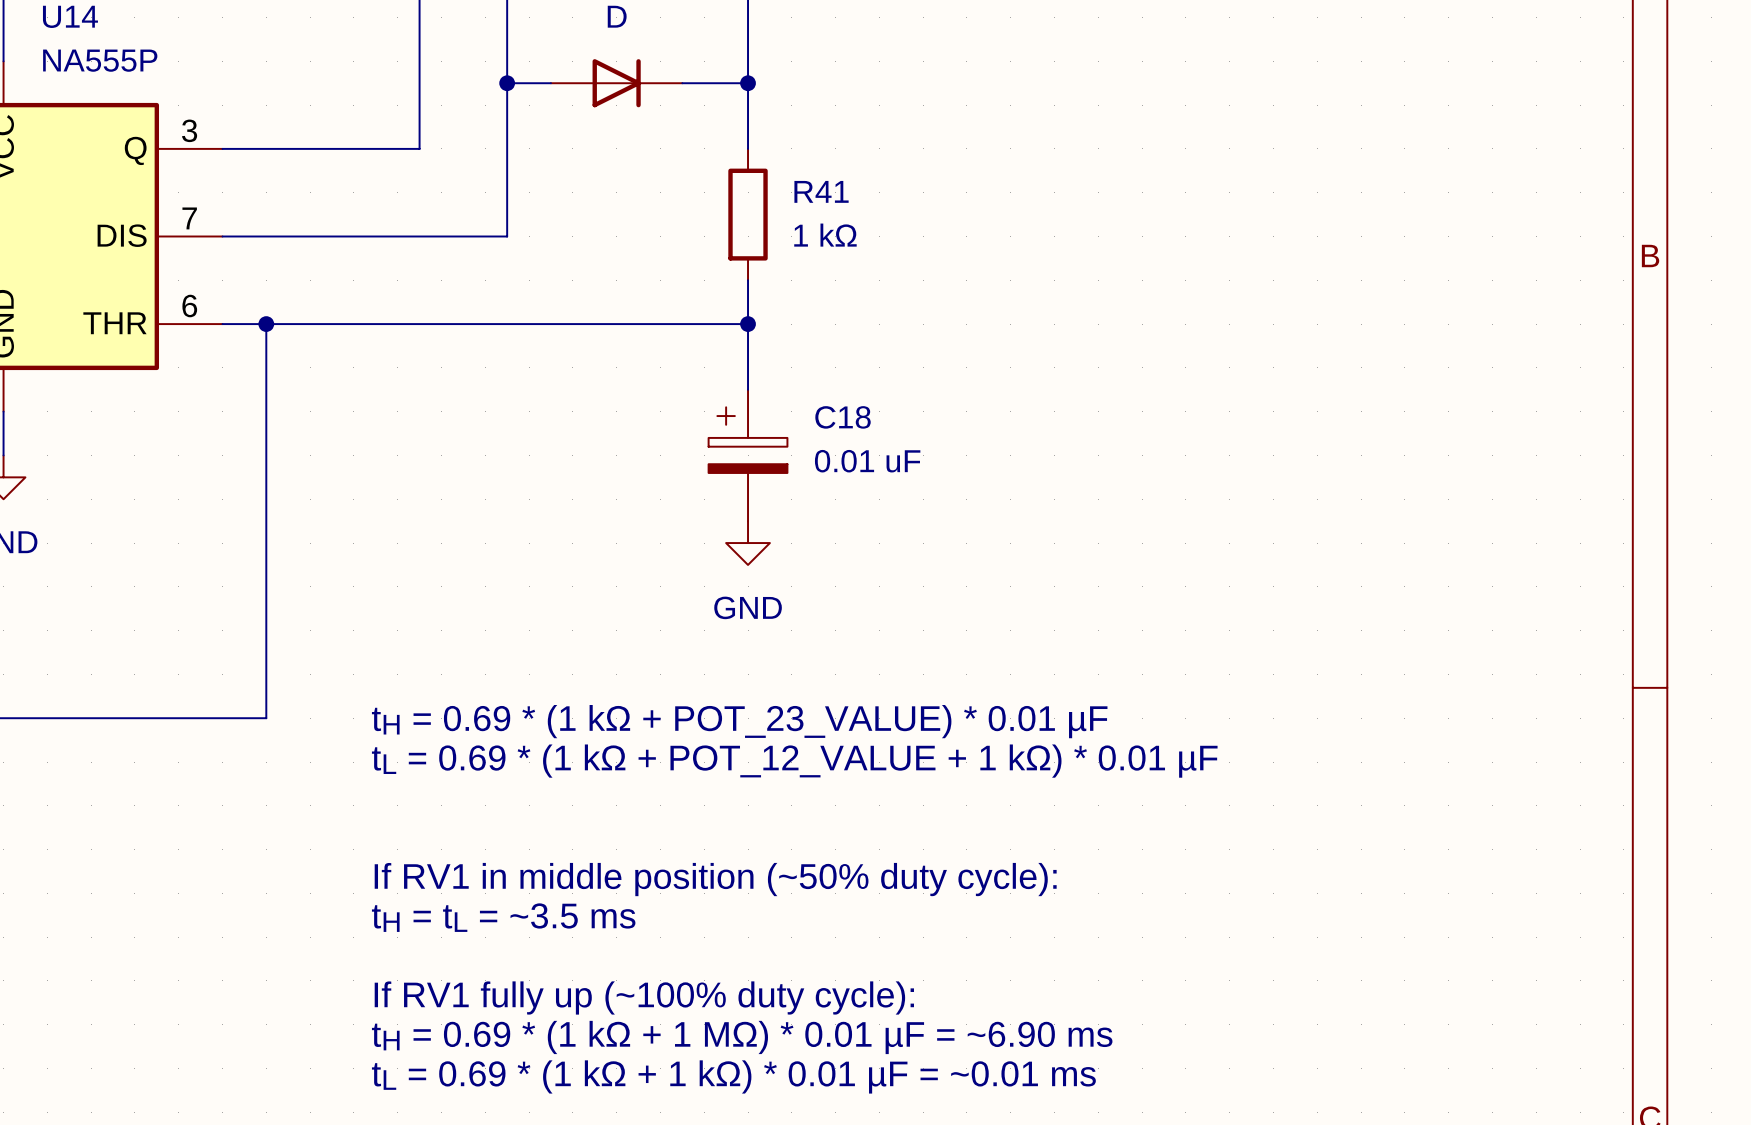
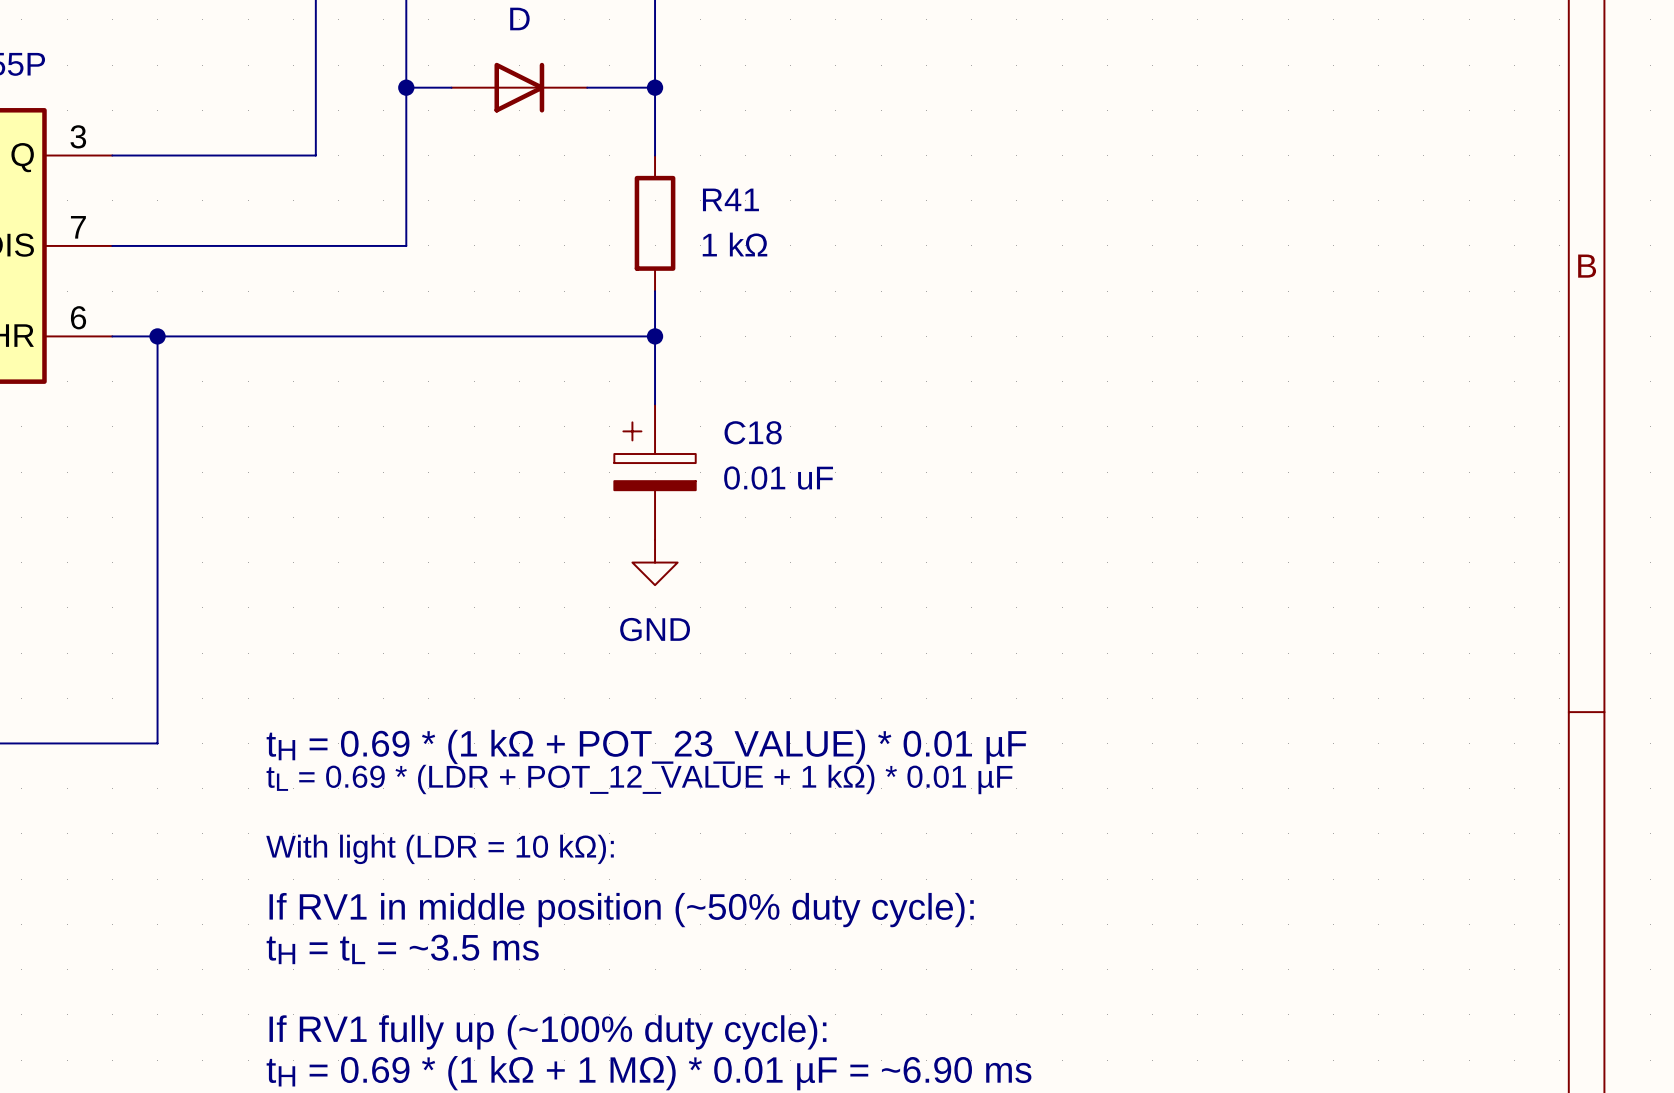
text: tL = 0.69 * (1 kΩ + POT_12_VALUE + 1 kΩ) * 0.01 µF (794, 761) -> tL = 0.69 * (LDR + POT_12_VALUE + 1 kΩ) * 0.01 µF (639, 779)
text: none -> With light (LDR = 10 kΩ): (440, 849)

